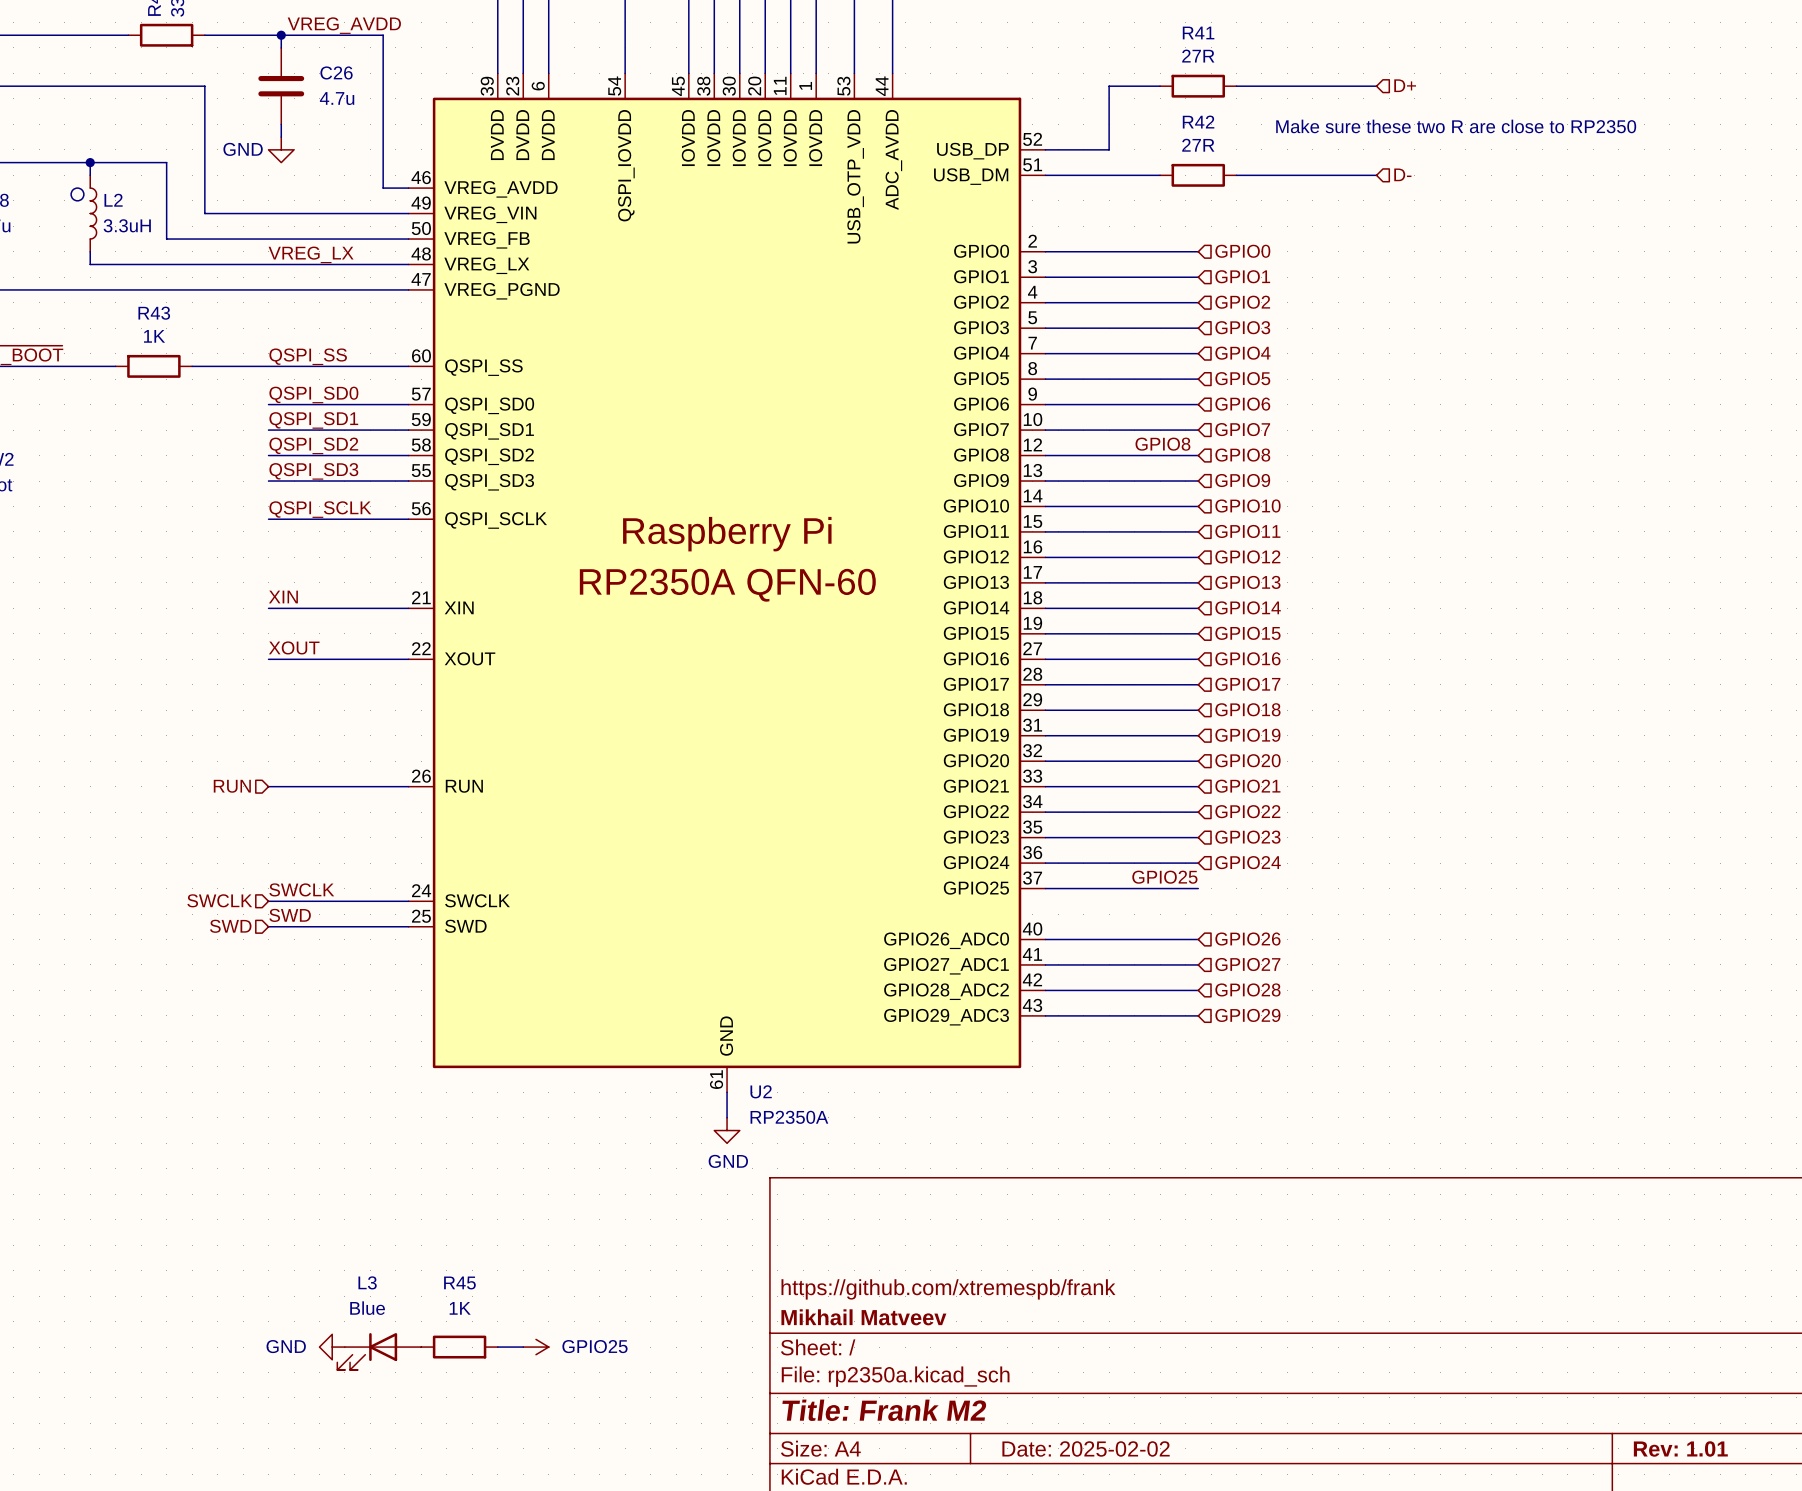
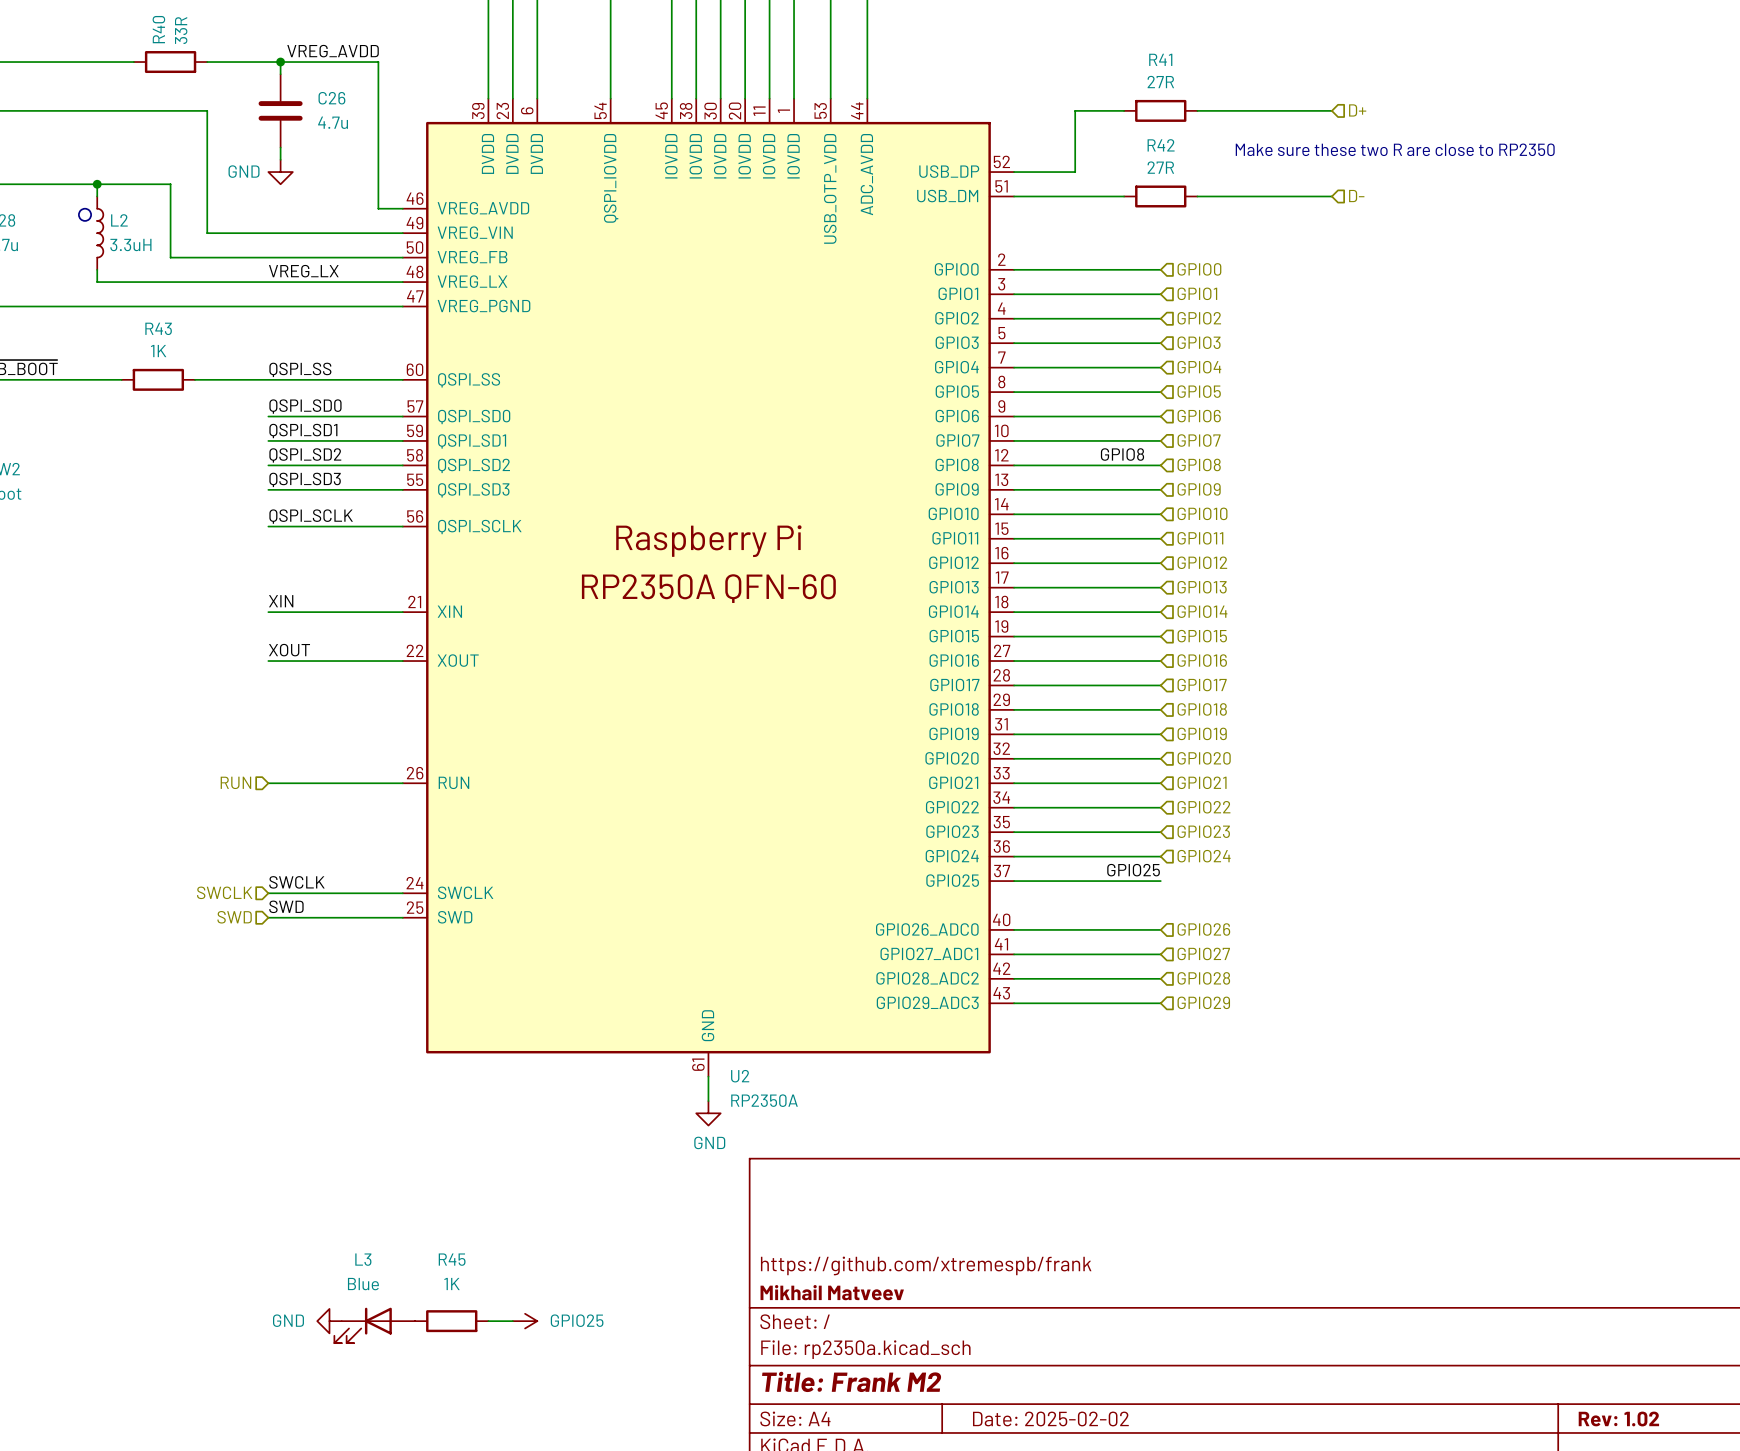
title block: Rev: 1.01 (1680, 1448) -> Rev: 1.02 (1618, 1419)

